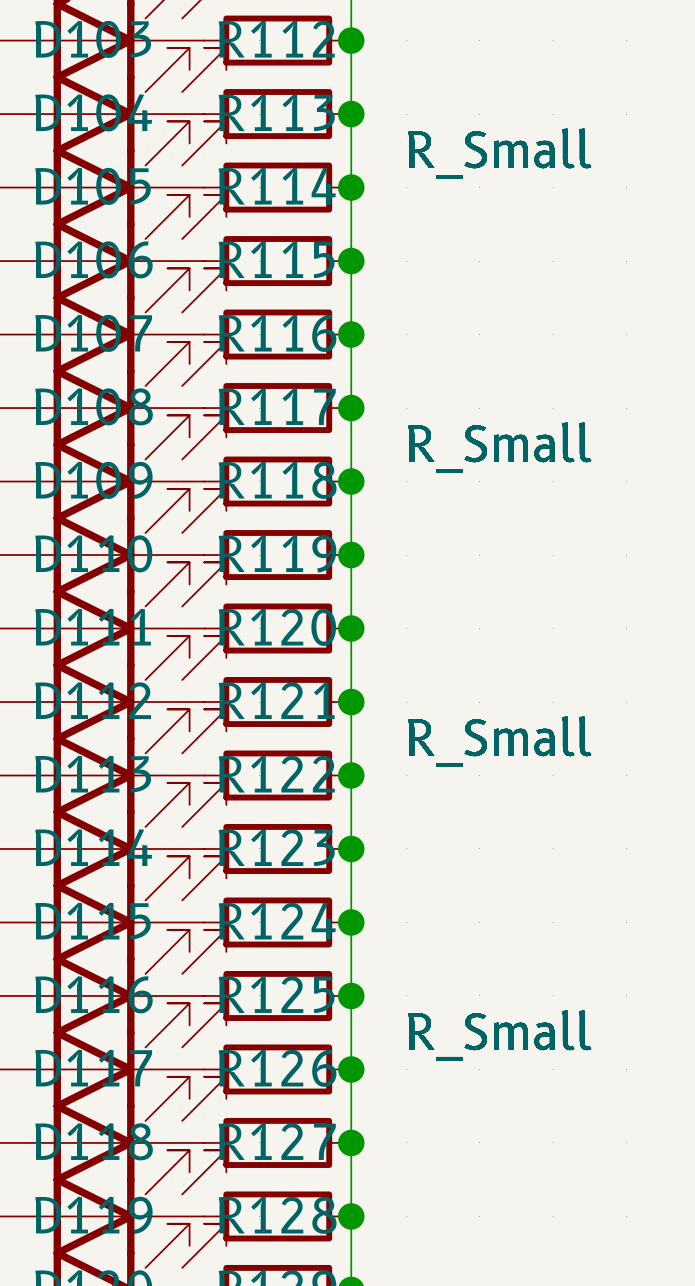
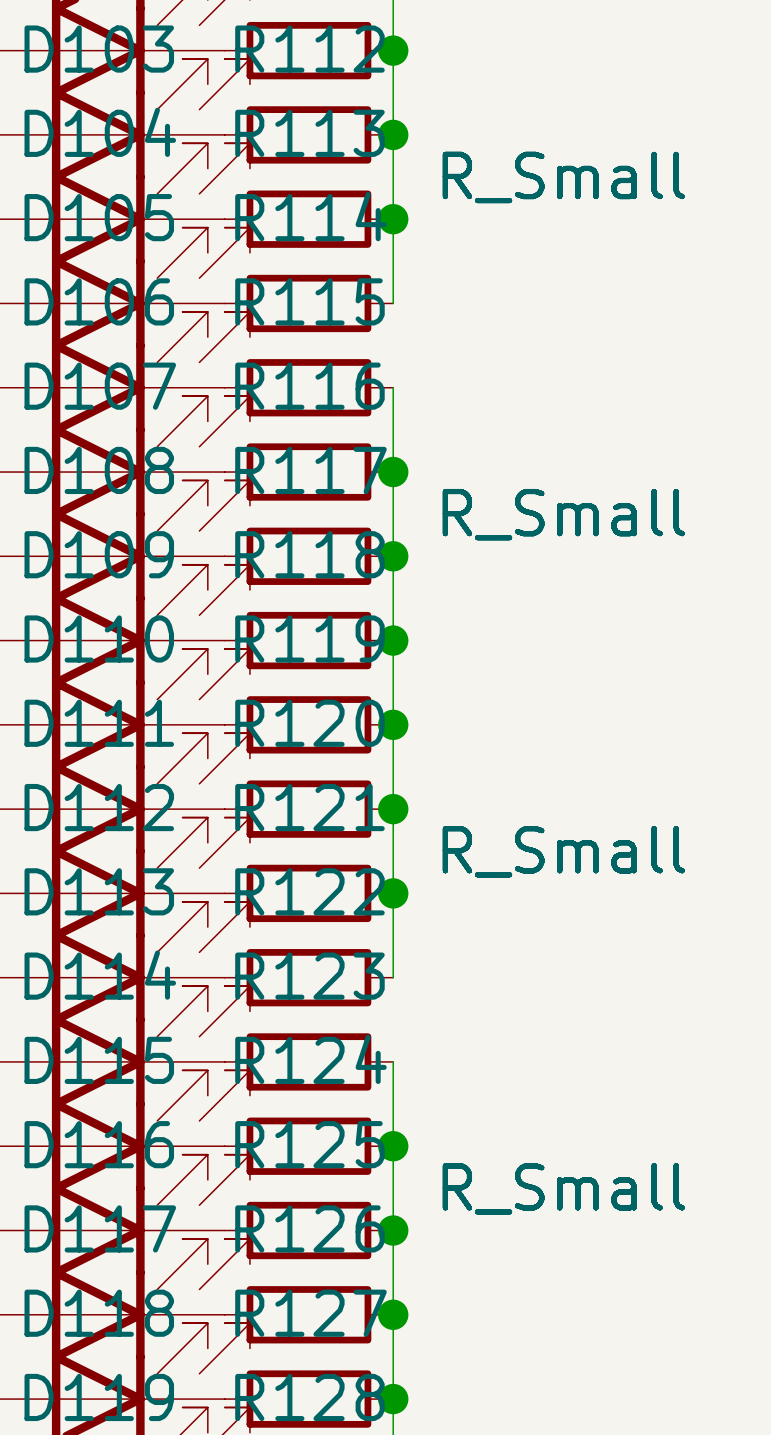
wire: (351, 261) (351, 334) -> none
junction: (351, 261) -> none
junction: (351, 334) -> none
wire: (351, 848) (351, 922) -> none
junction: (351, 848) -> none
junction: (351, 922) -> none

